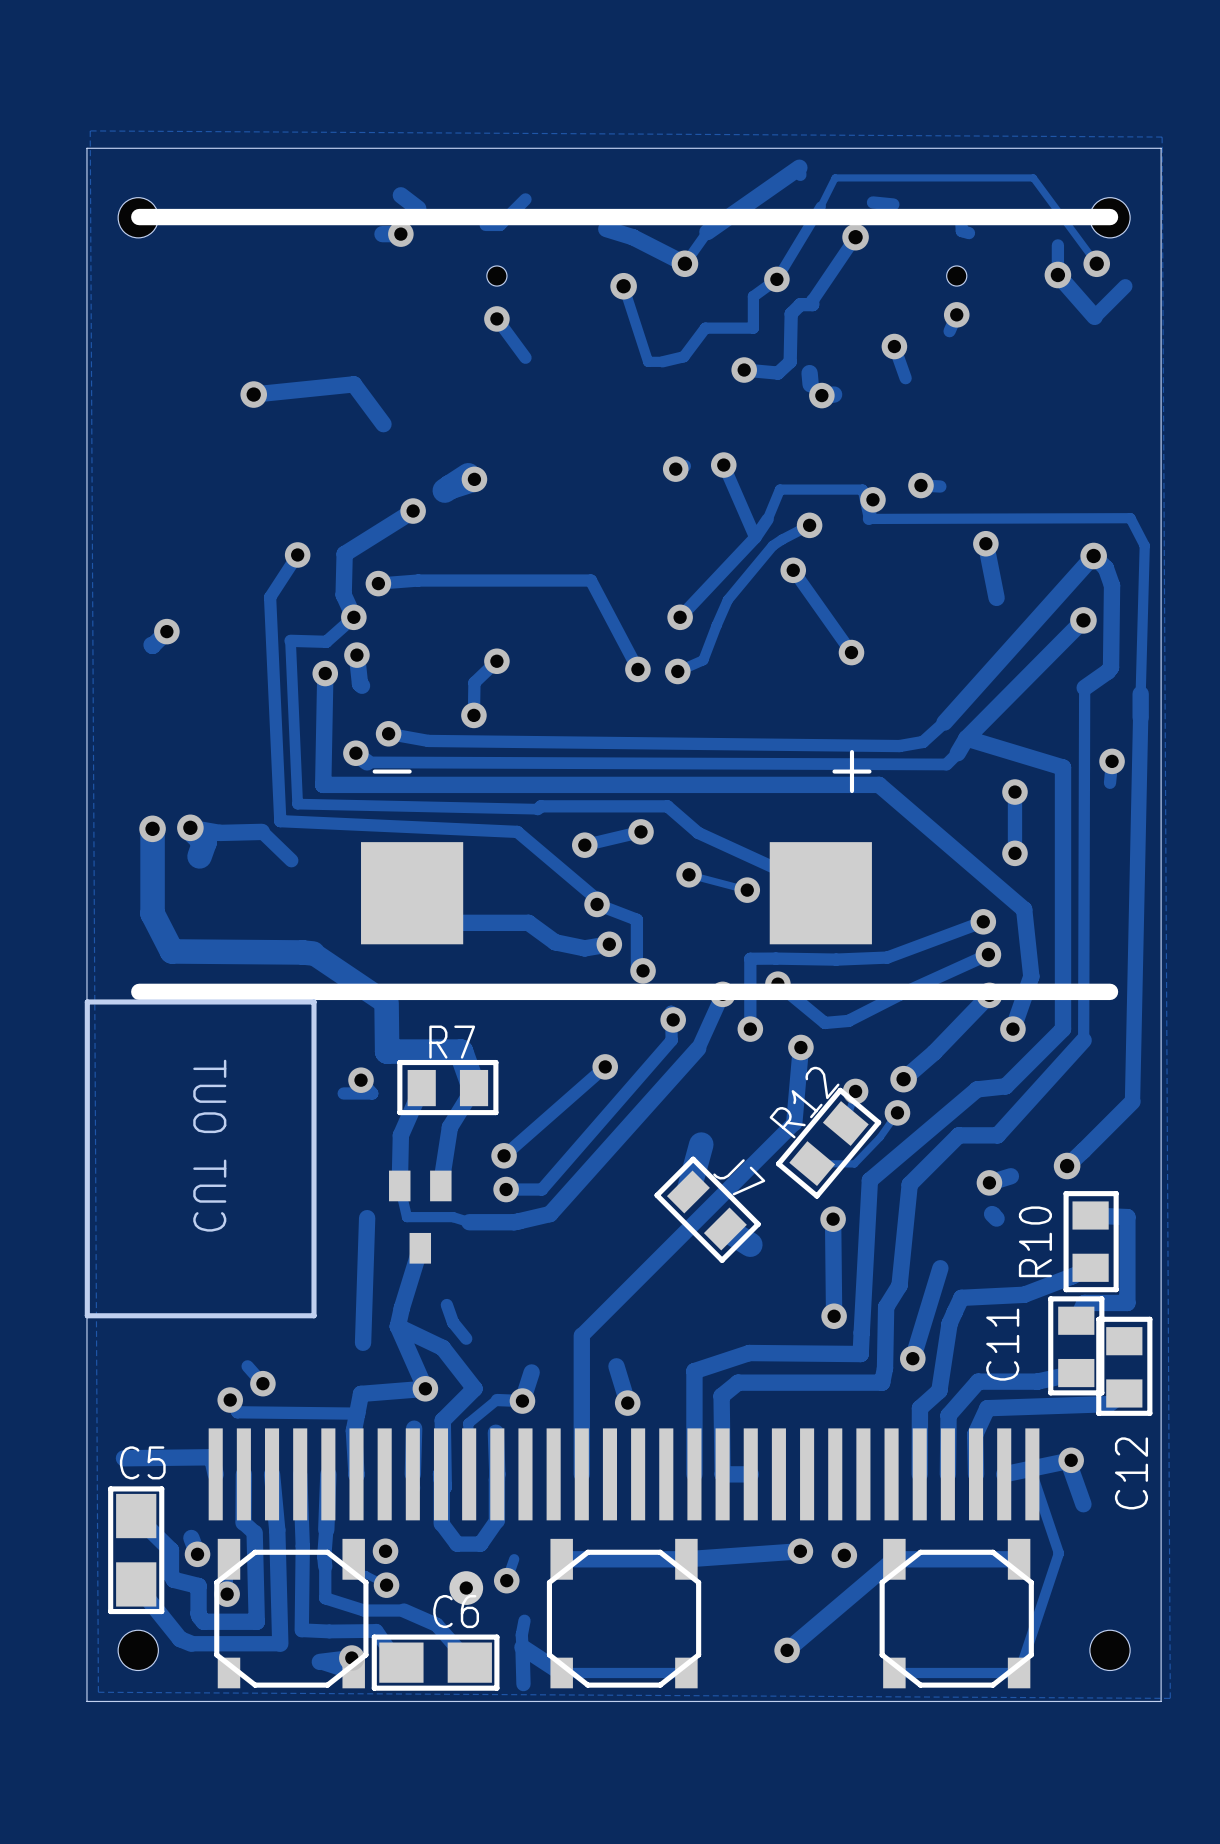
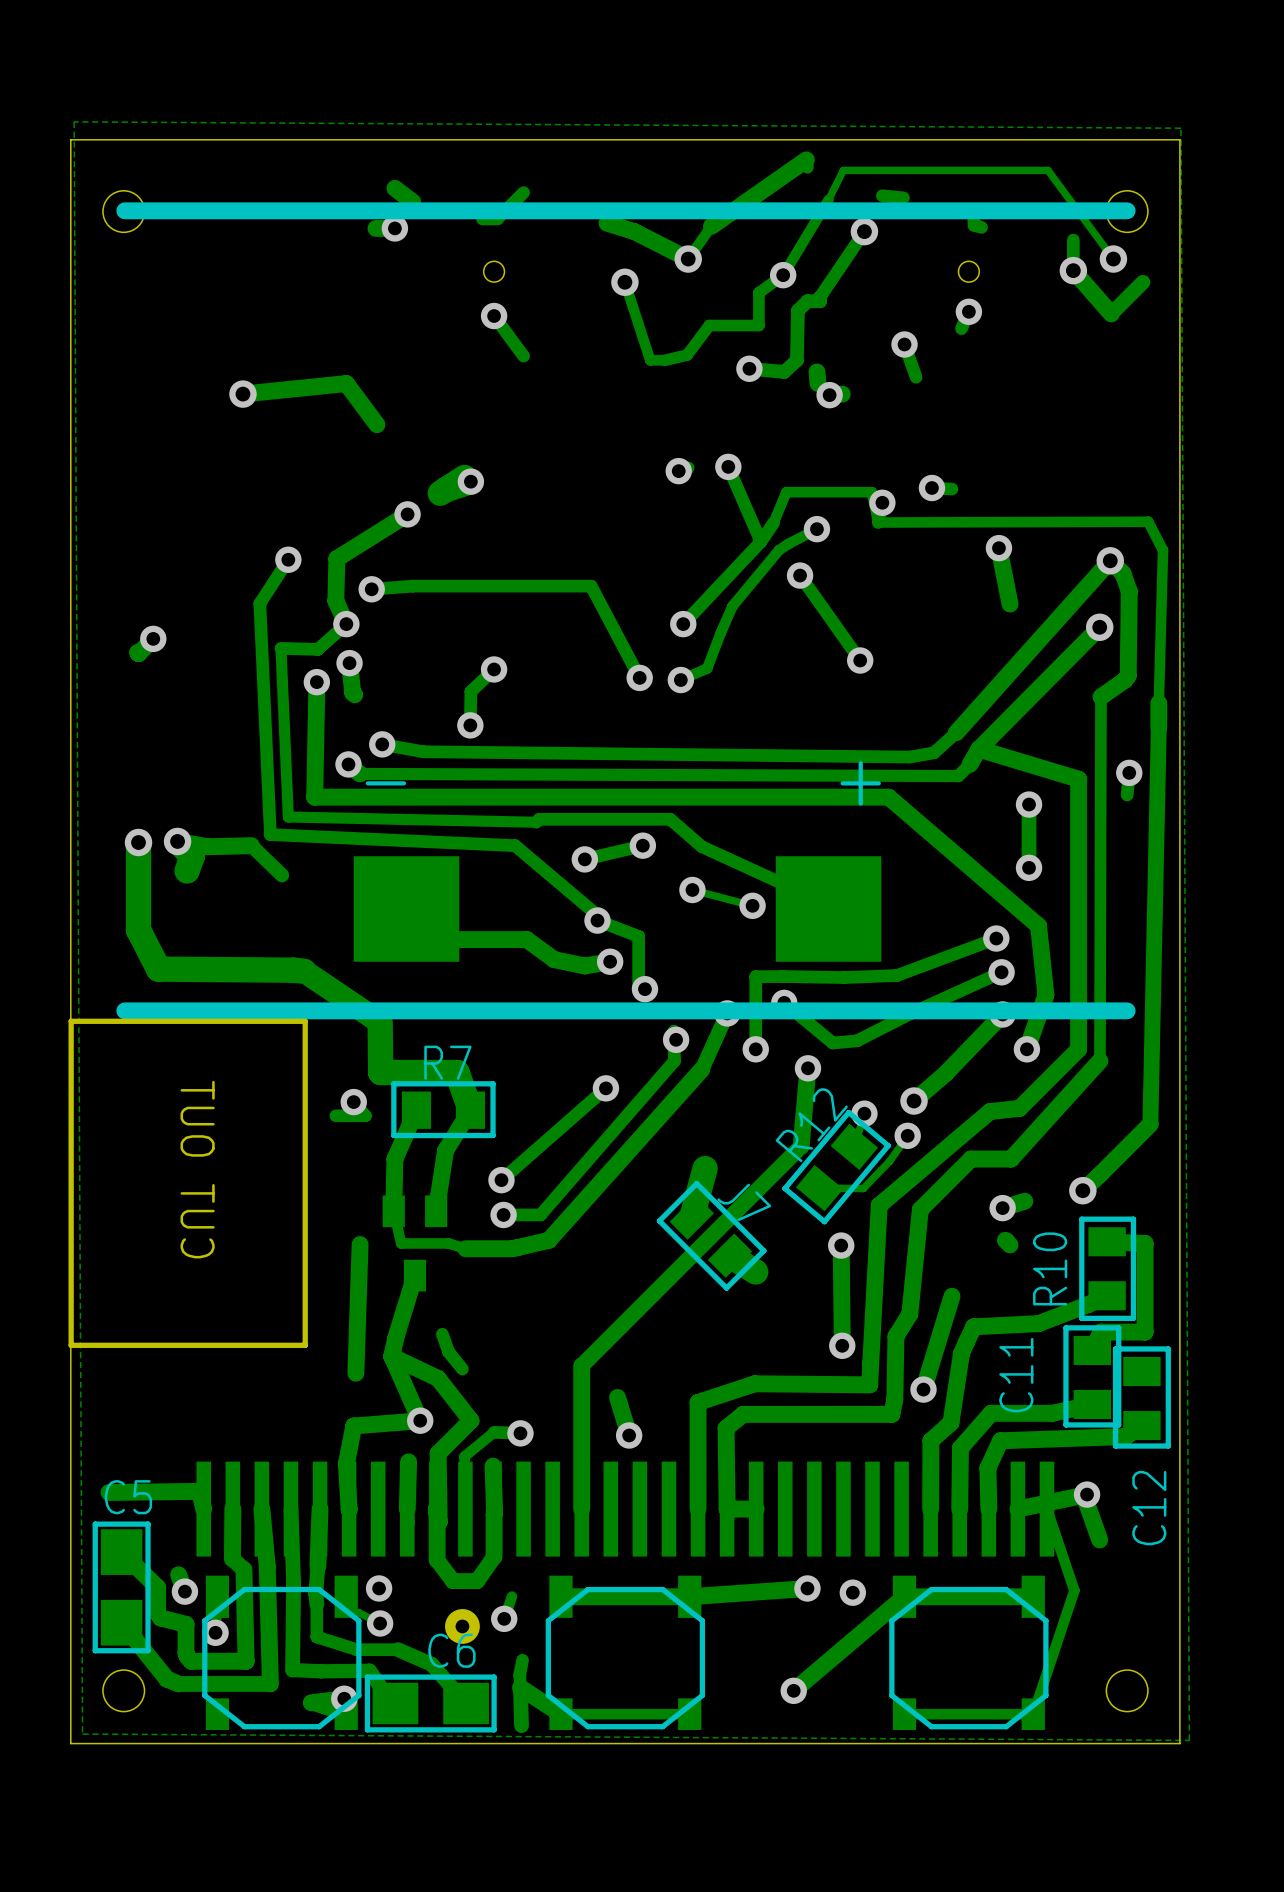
track: (247, 1366) (262, 1383) -> none
track: (531, 1372) (522, 1401) -> none
via: (262, 1383) -> none
track: (230, 1400) (237, 1412) (357, 1413) -> none
via: (230, 1400) -> none

